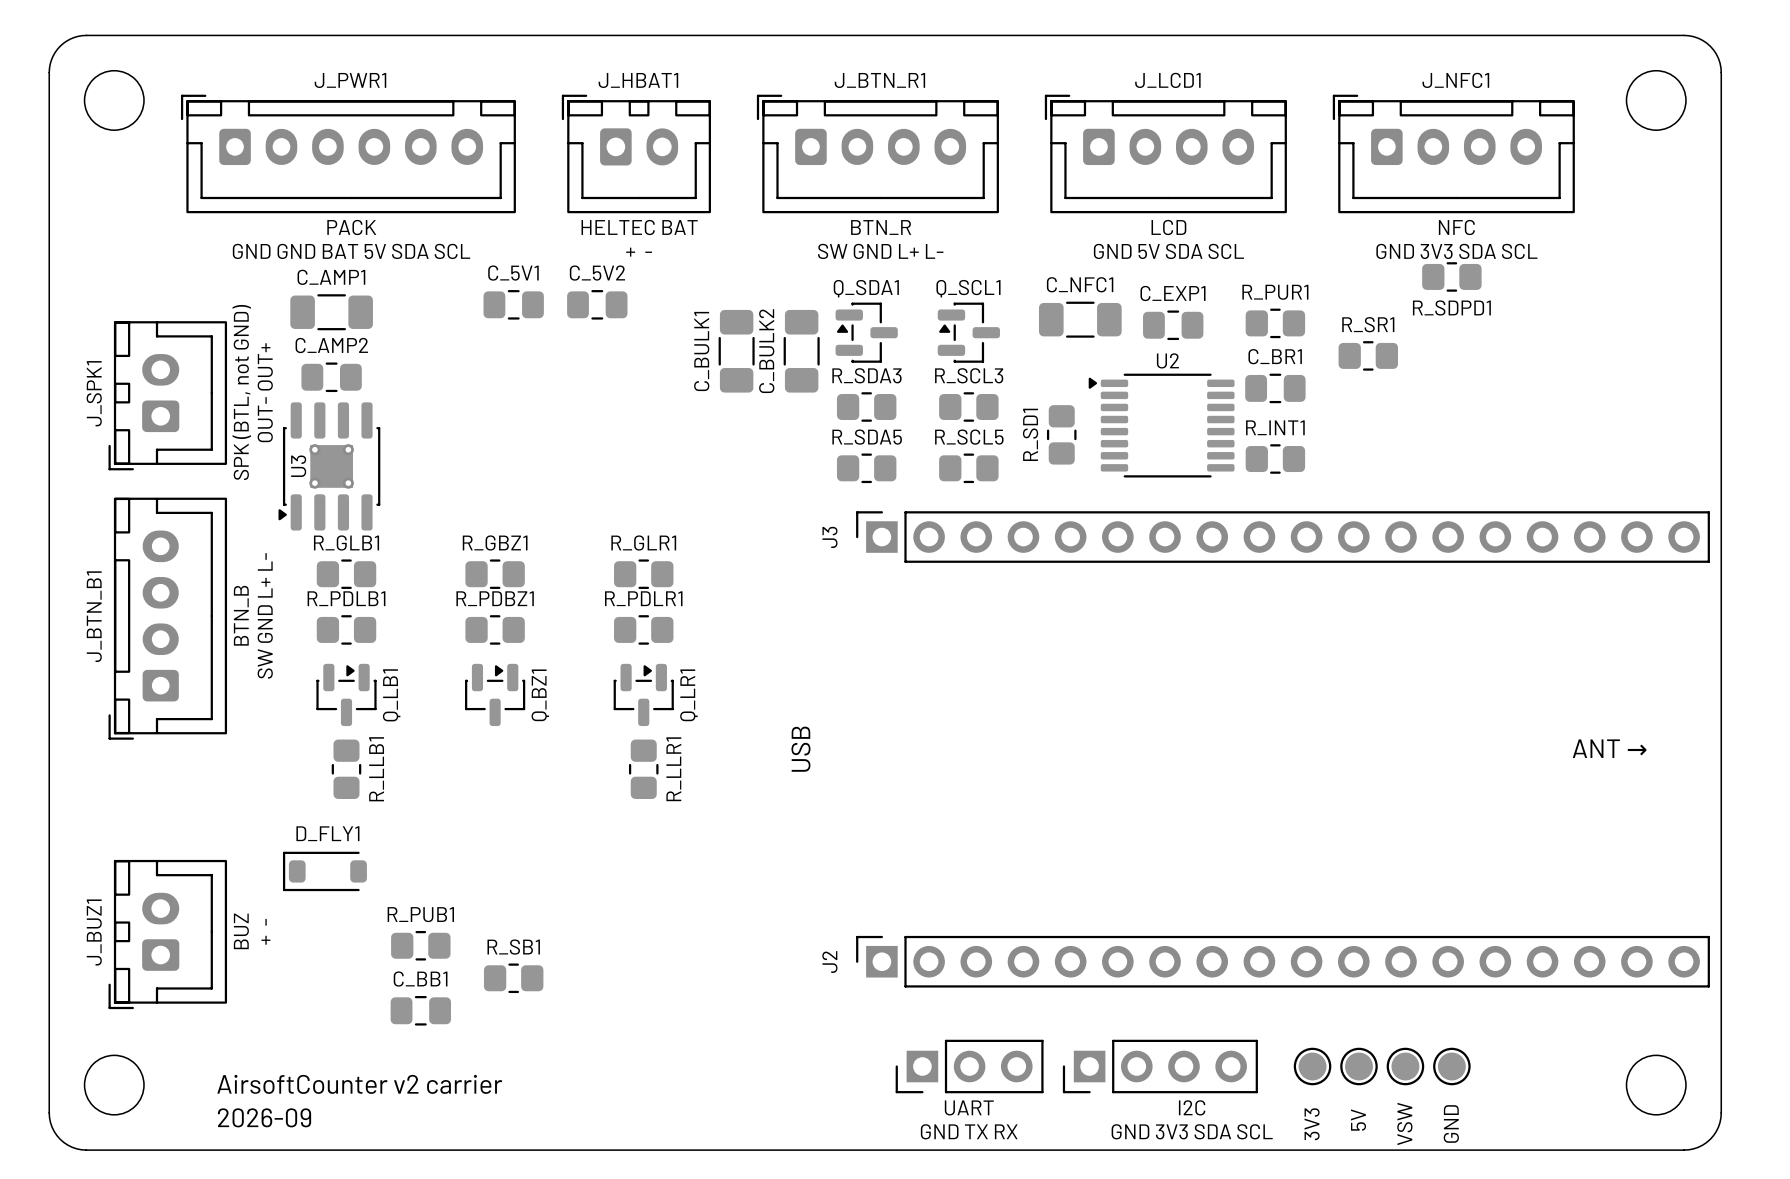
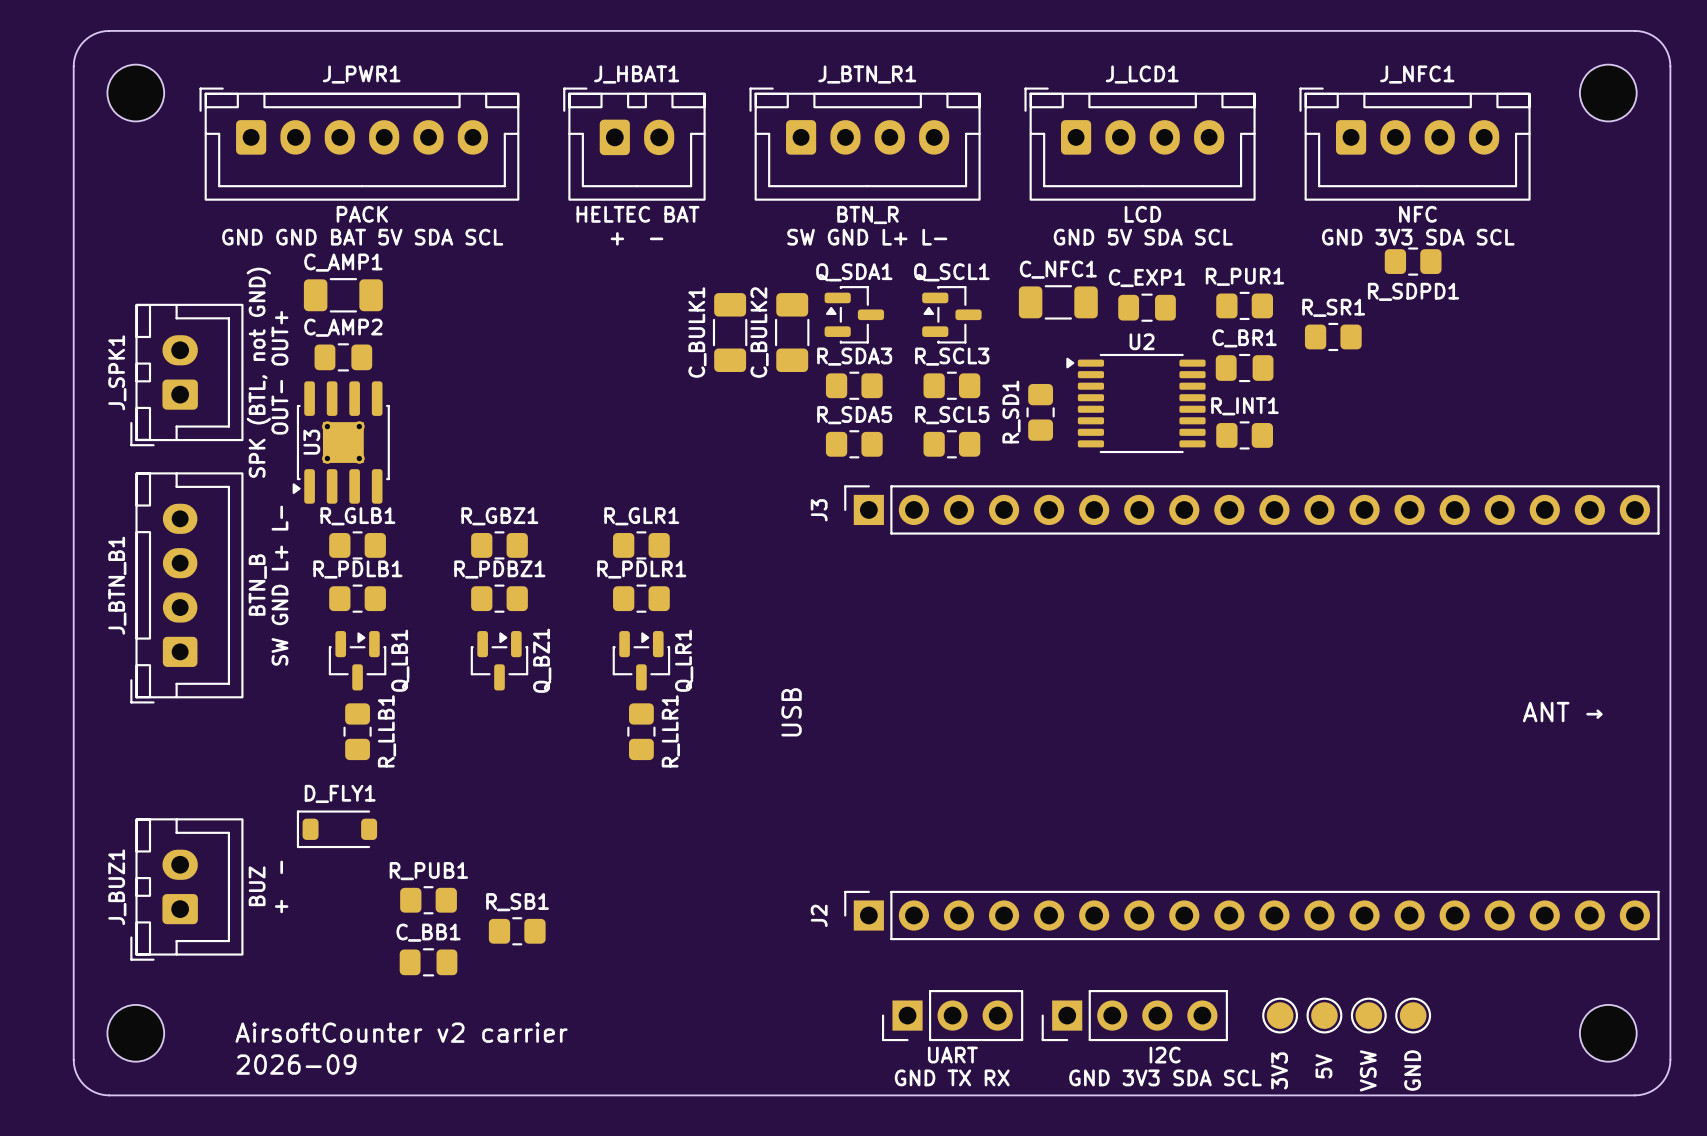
C_5V1: (513, 304) -> none
C_5V2: (597, 304) -> none

